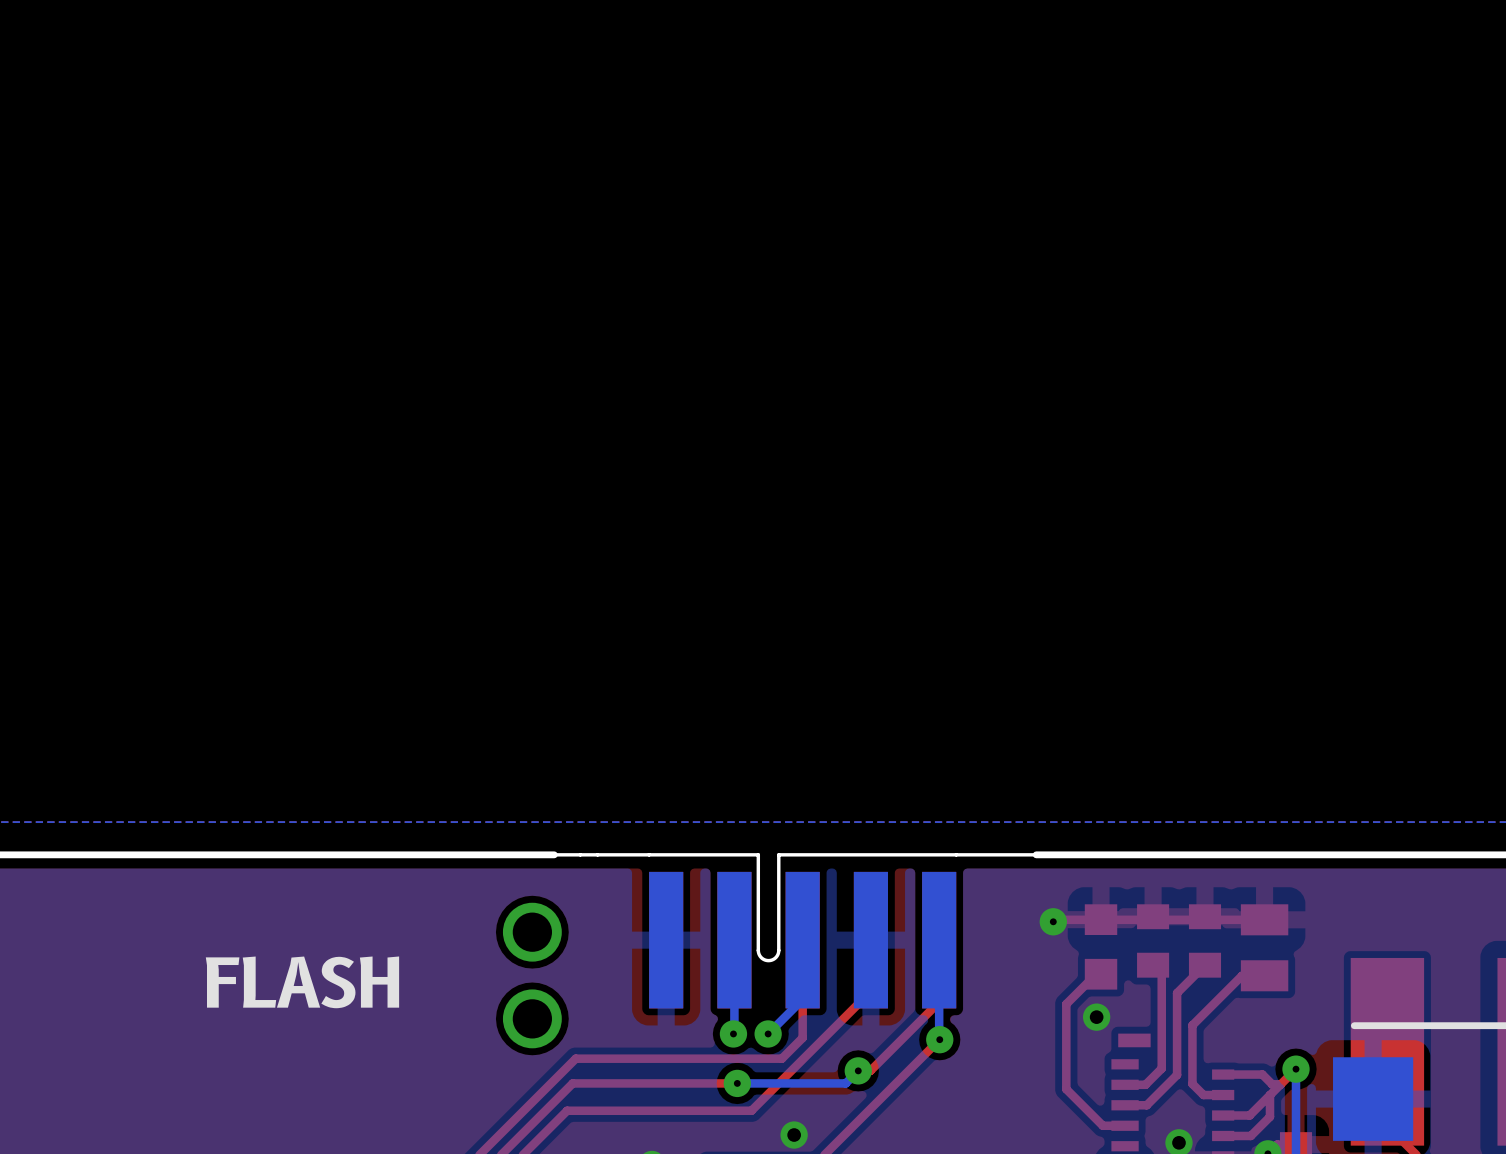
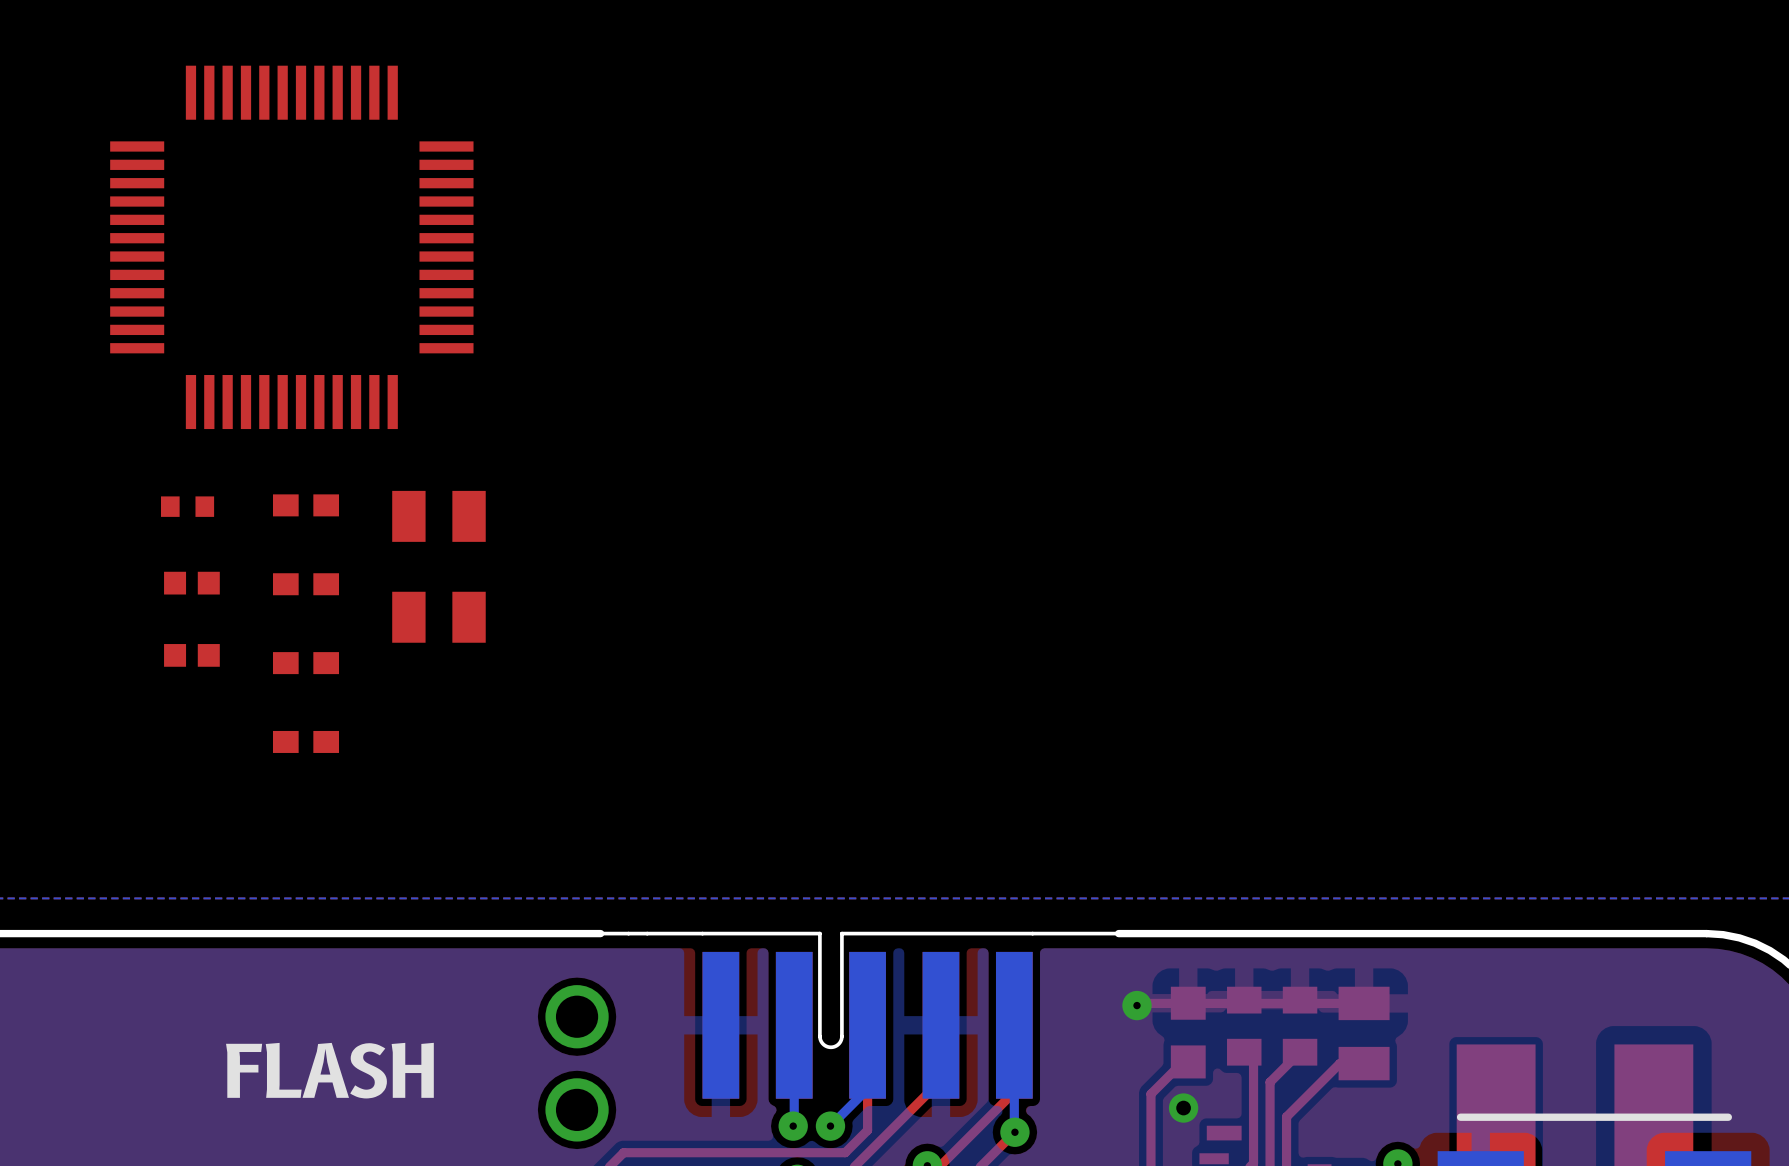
part: none -> (291, 247)
part: none -> (306, 505)
part: none -> (187, 506)
part: none -> (438, 516)
part: none -> (191, 583)
part: none -> (306, 584)
part: none -> (438, 617)
part: none -> (191, 655)
part: none -> (306, 663)
part: none -> (306, 741)

